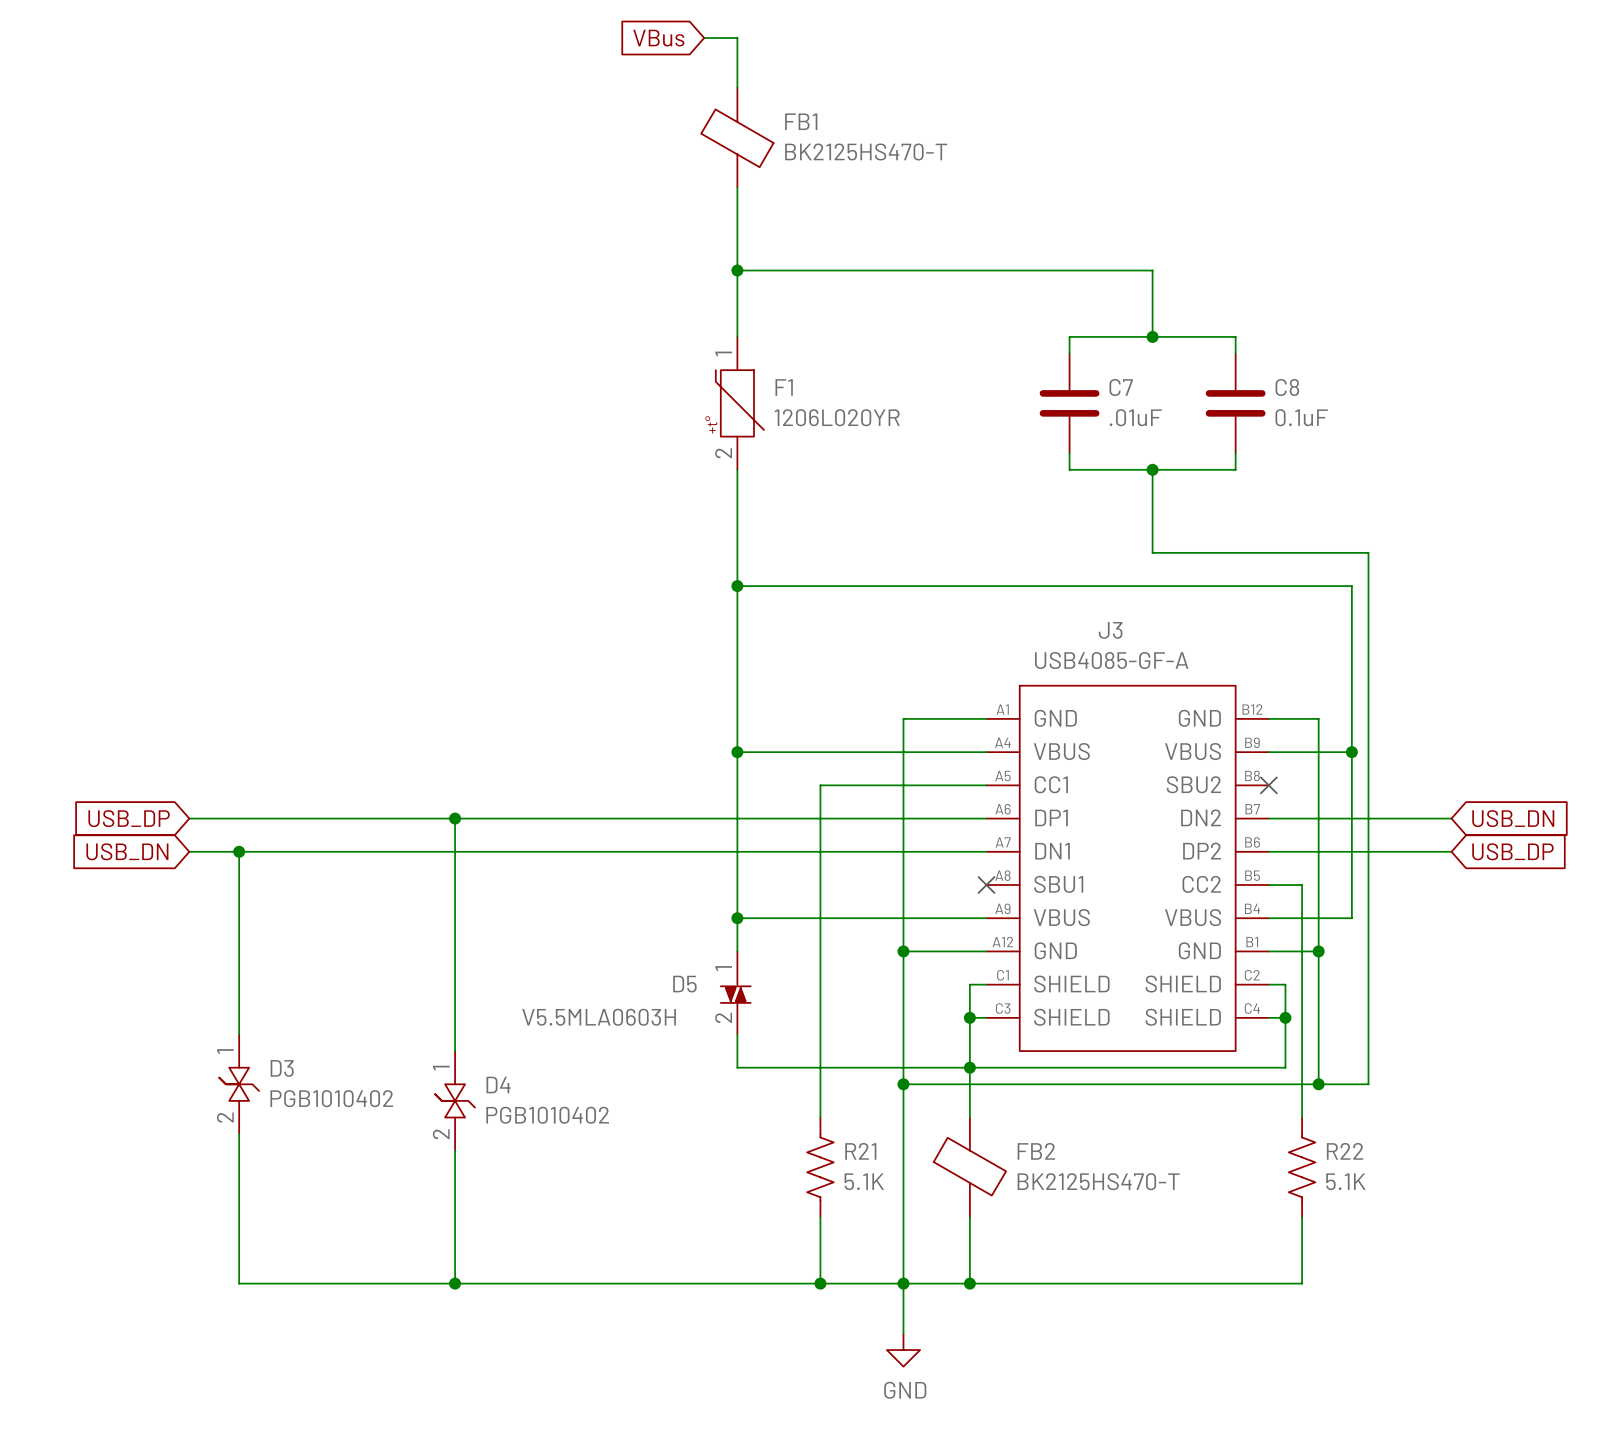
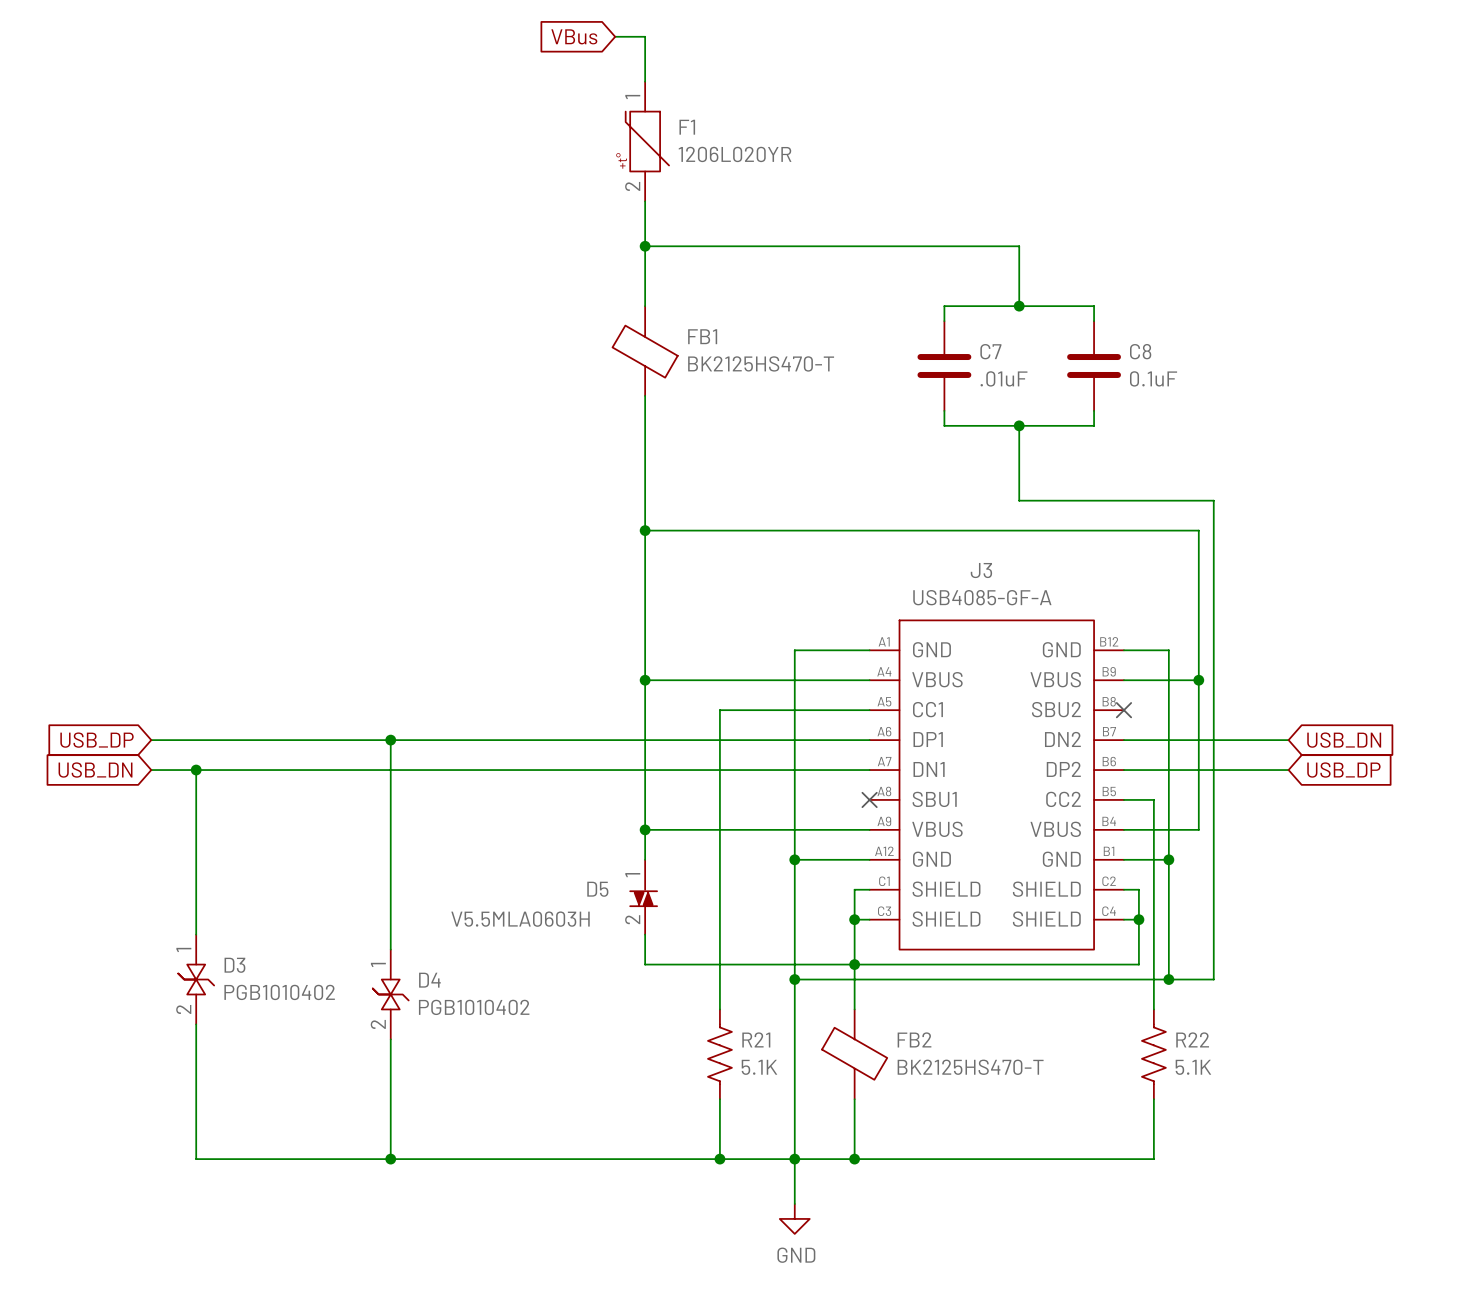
FB1 position: (737, 137) -> (645, 351)
F1 position: (739, 403) -> (647, 141)

